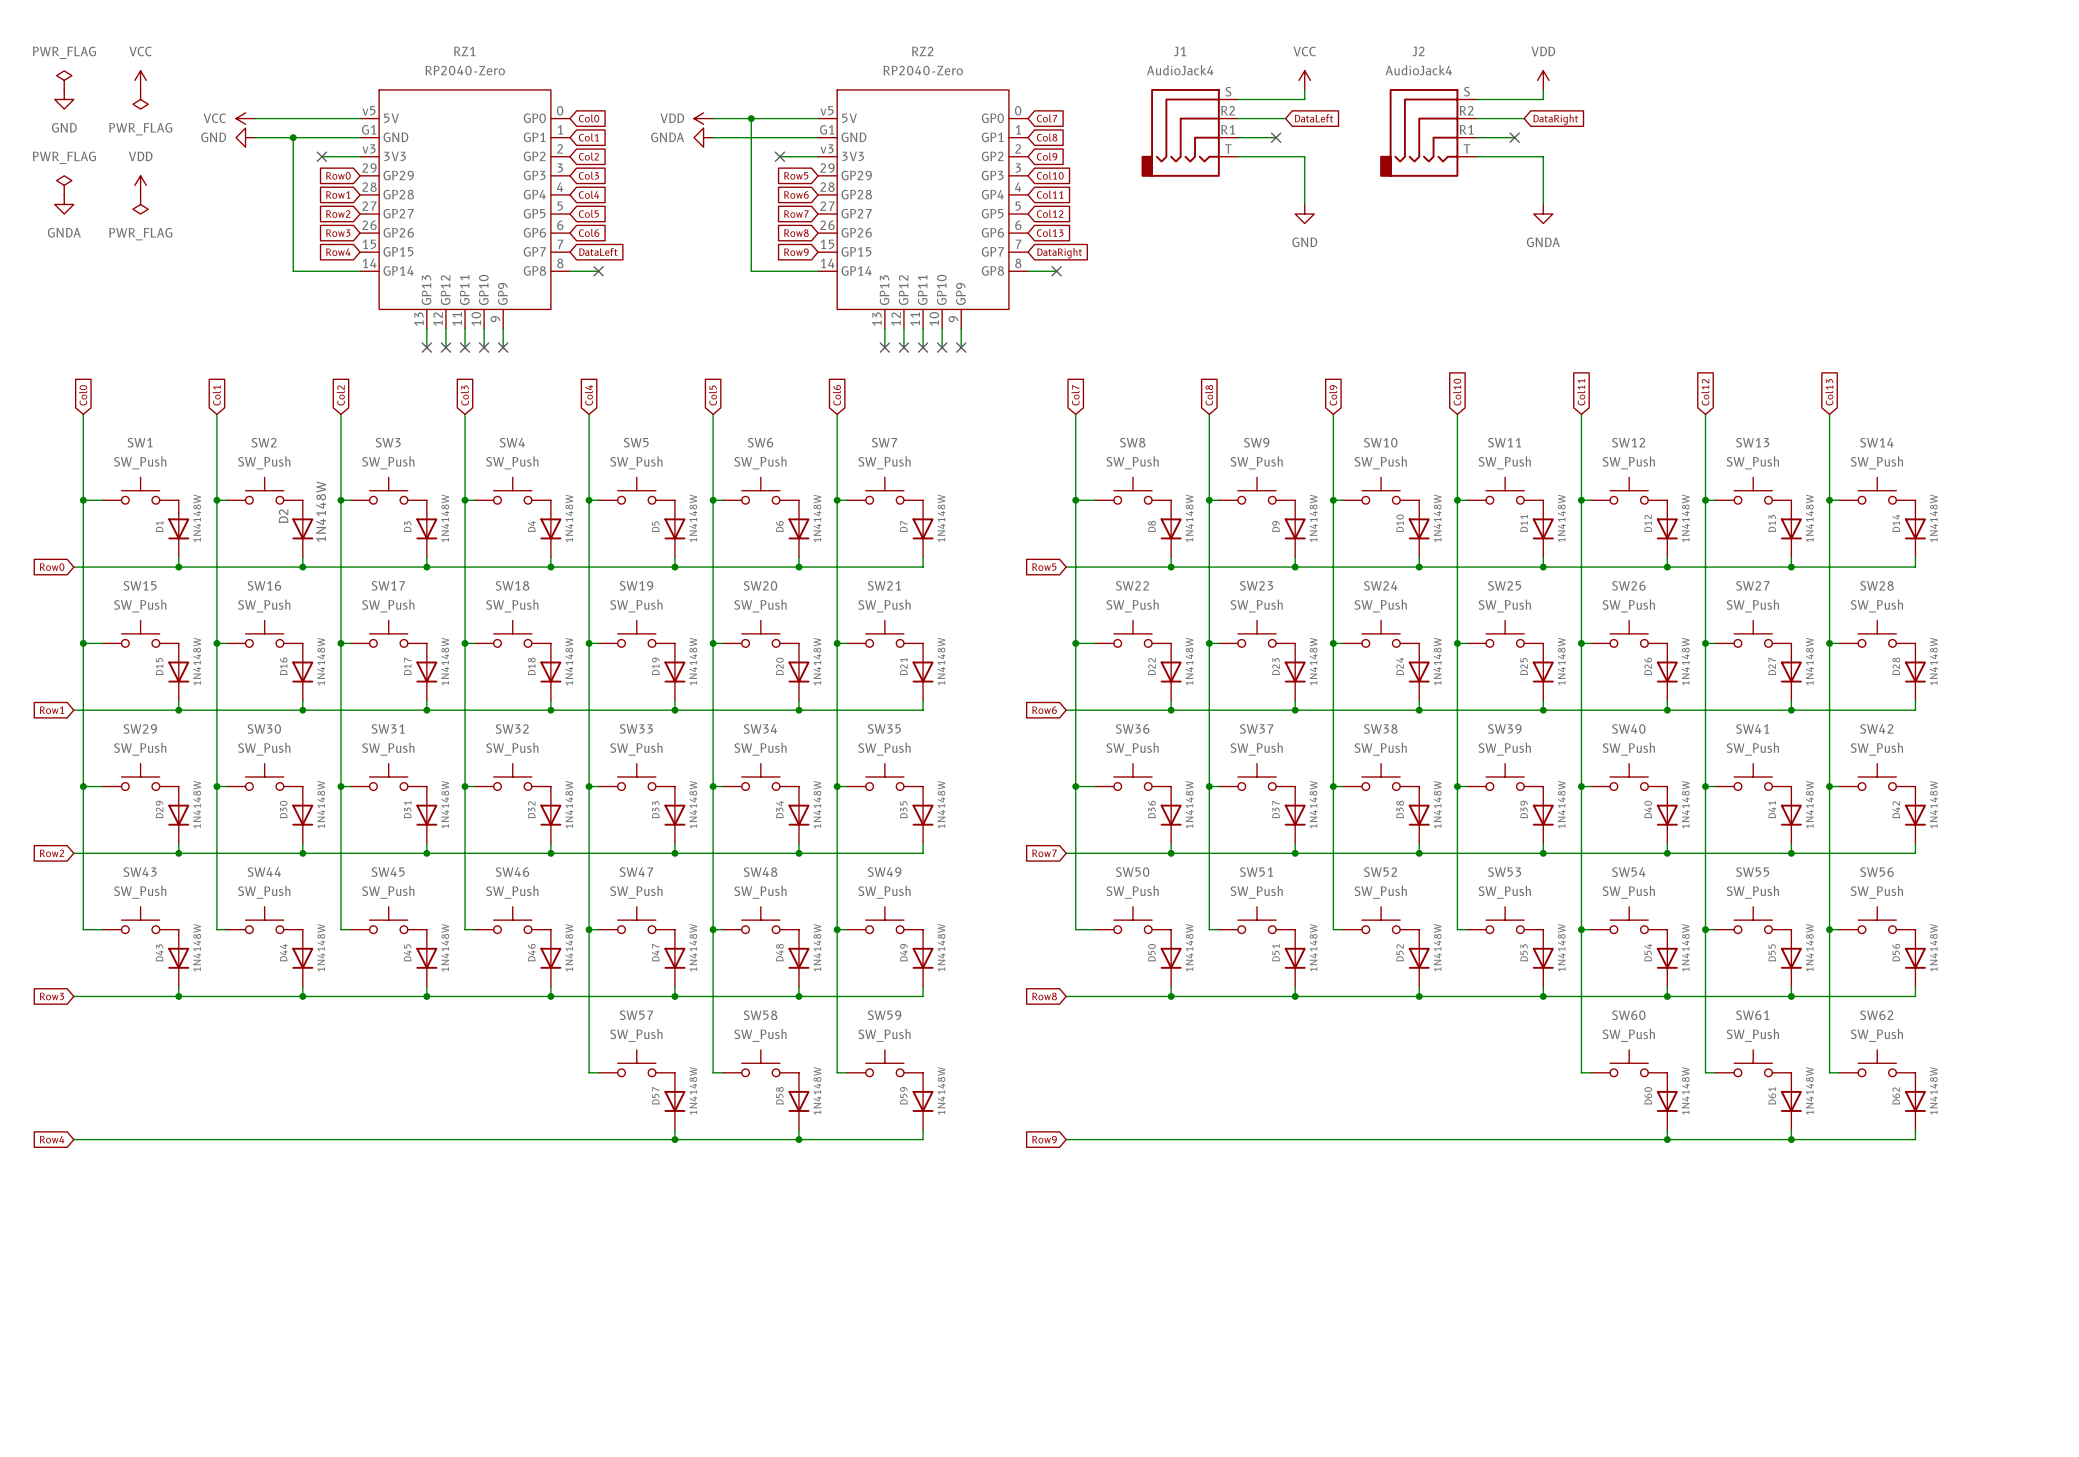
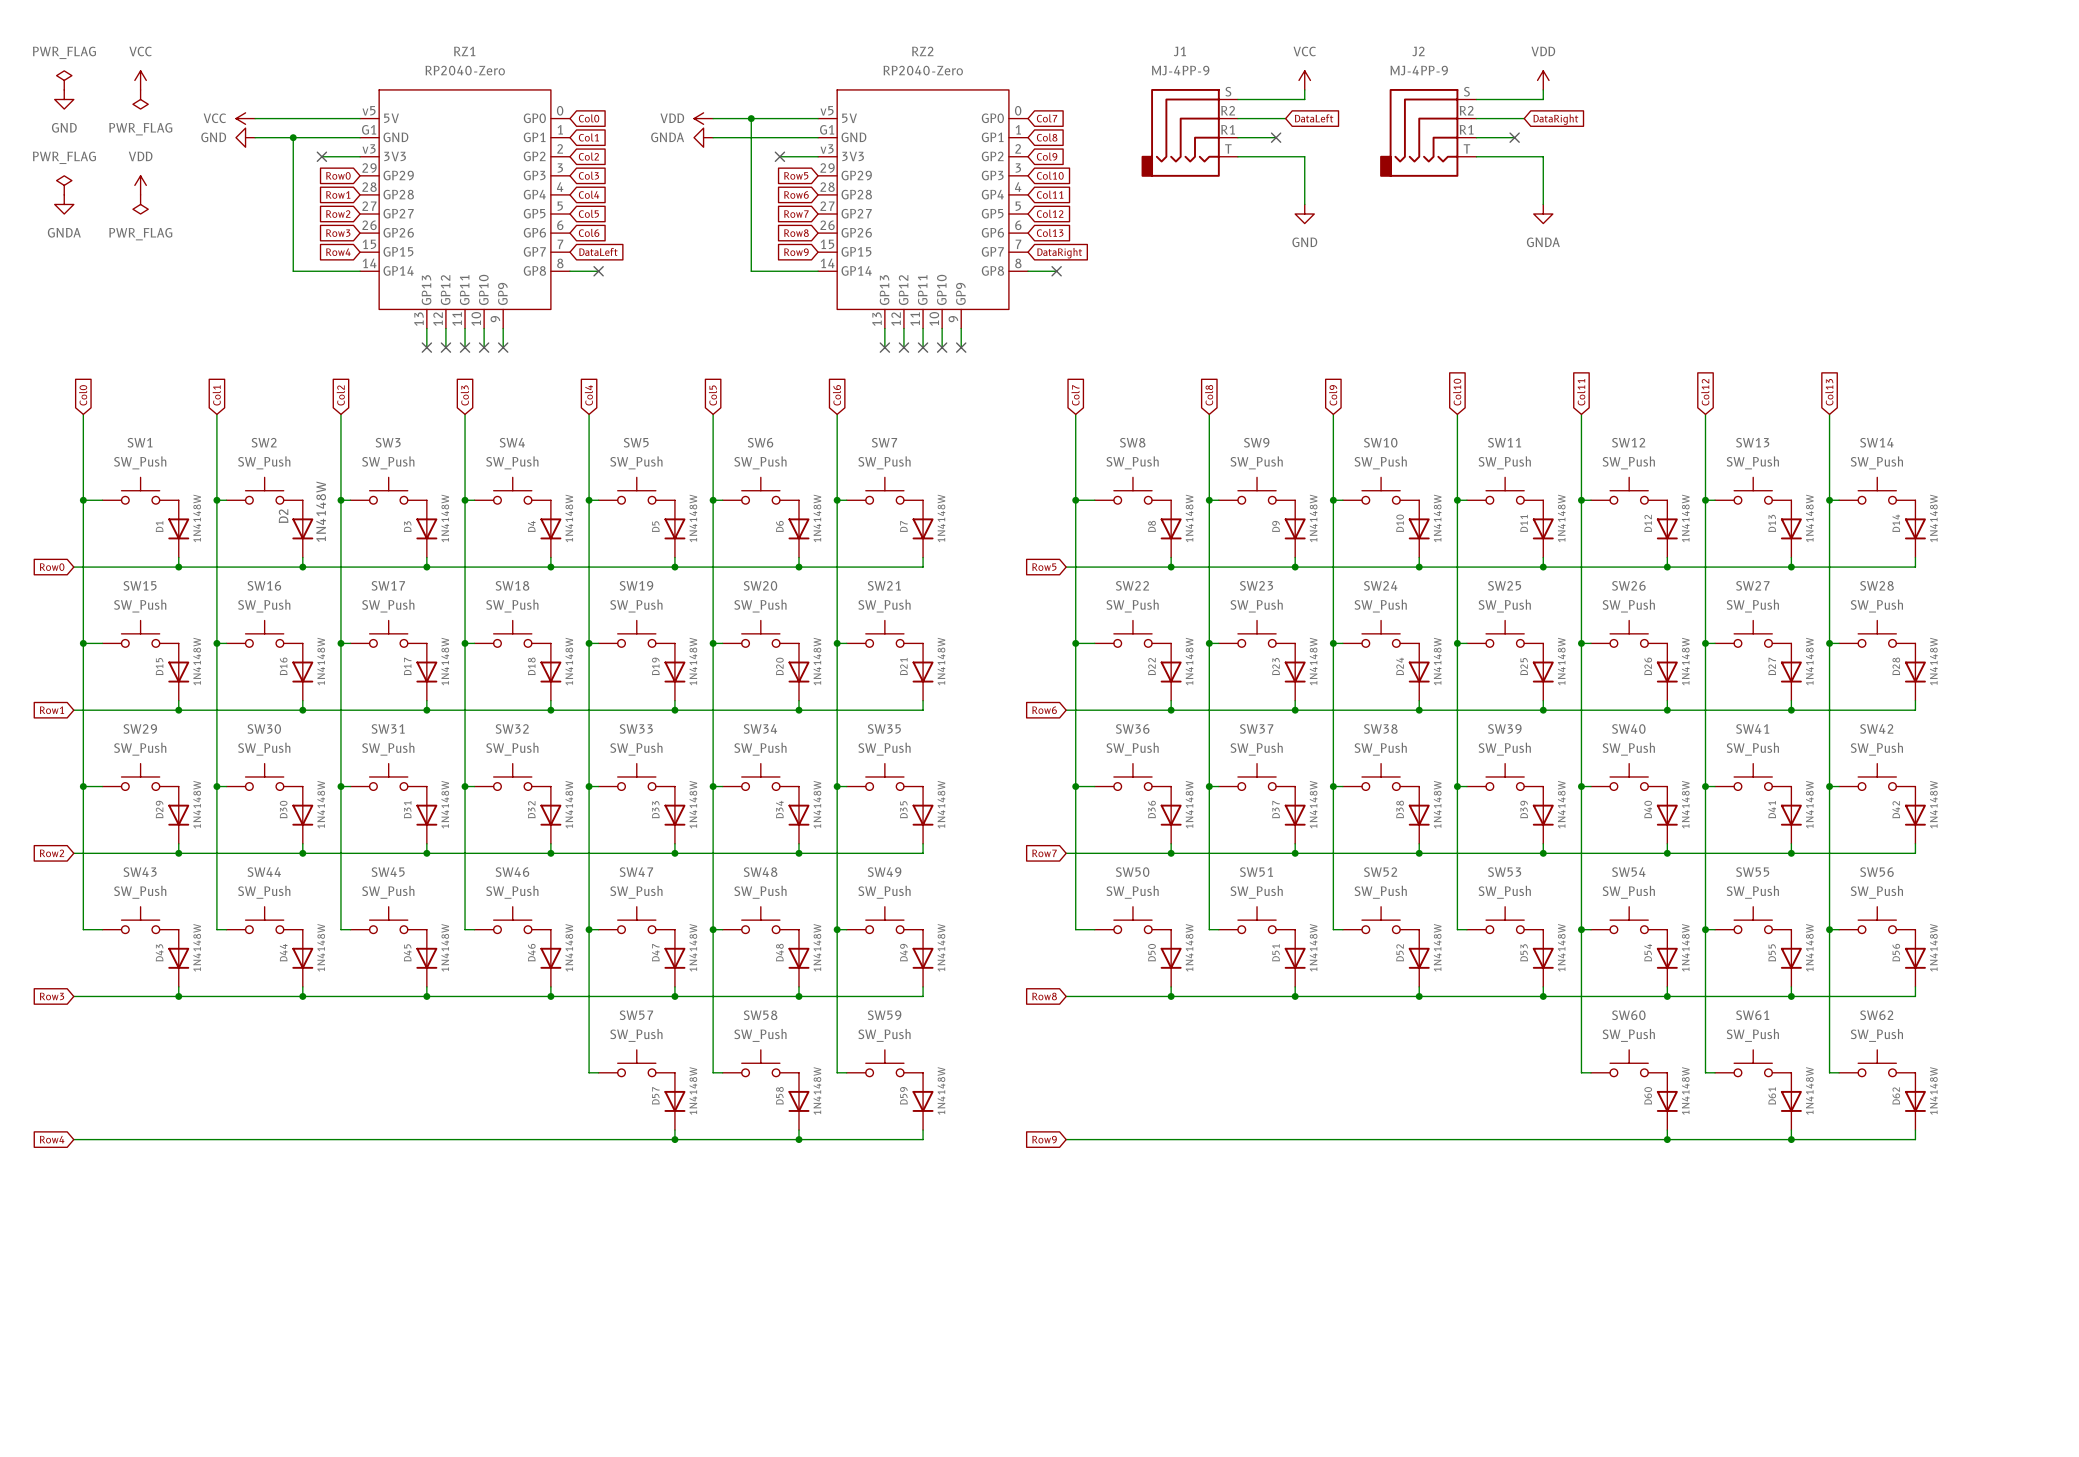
J1 value: AudioJack4 (1180, 70) -> MJ-4PP-9 (1180, 70)
J2 value: AudioJack4 (1418, 70) -> MJ-4PP-9 (1419, 70)

